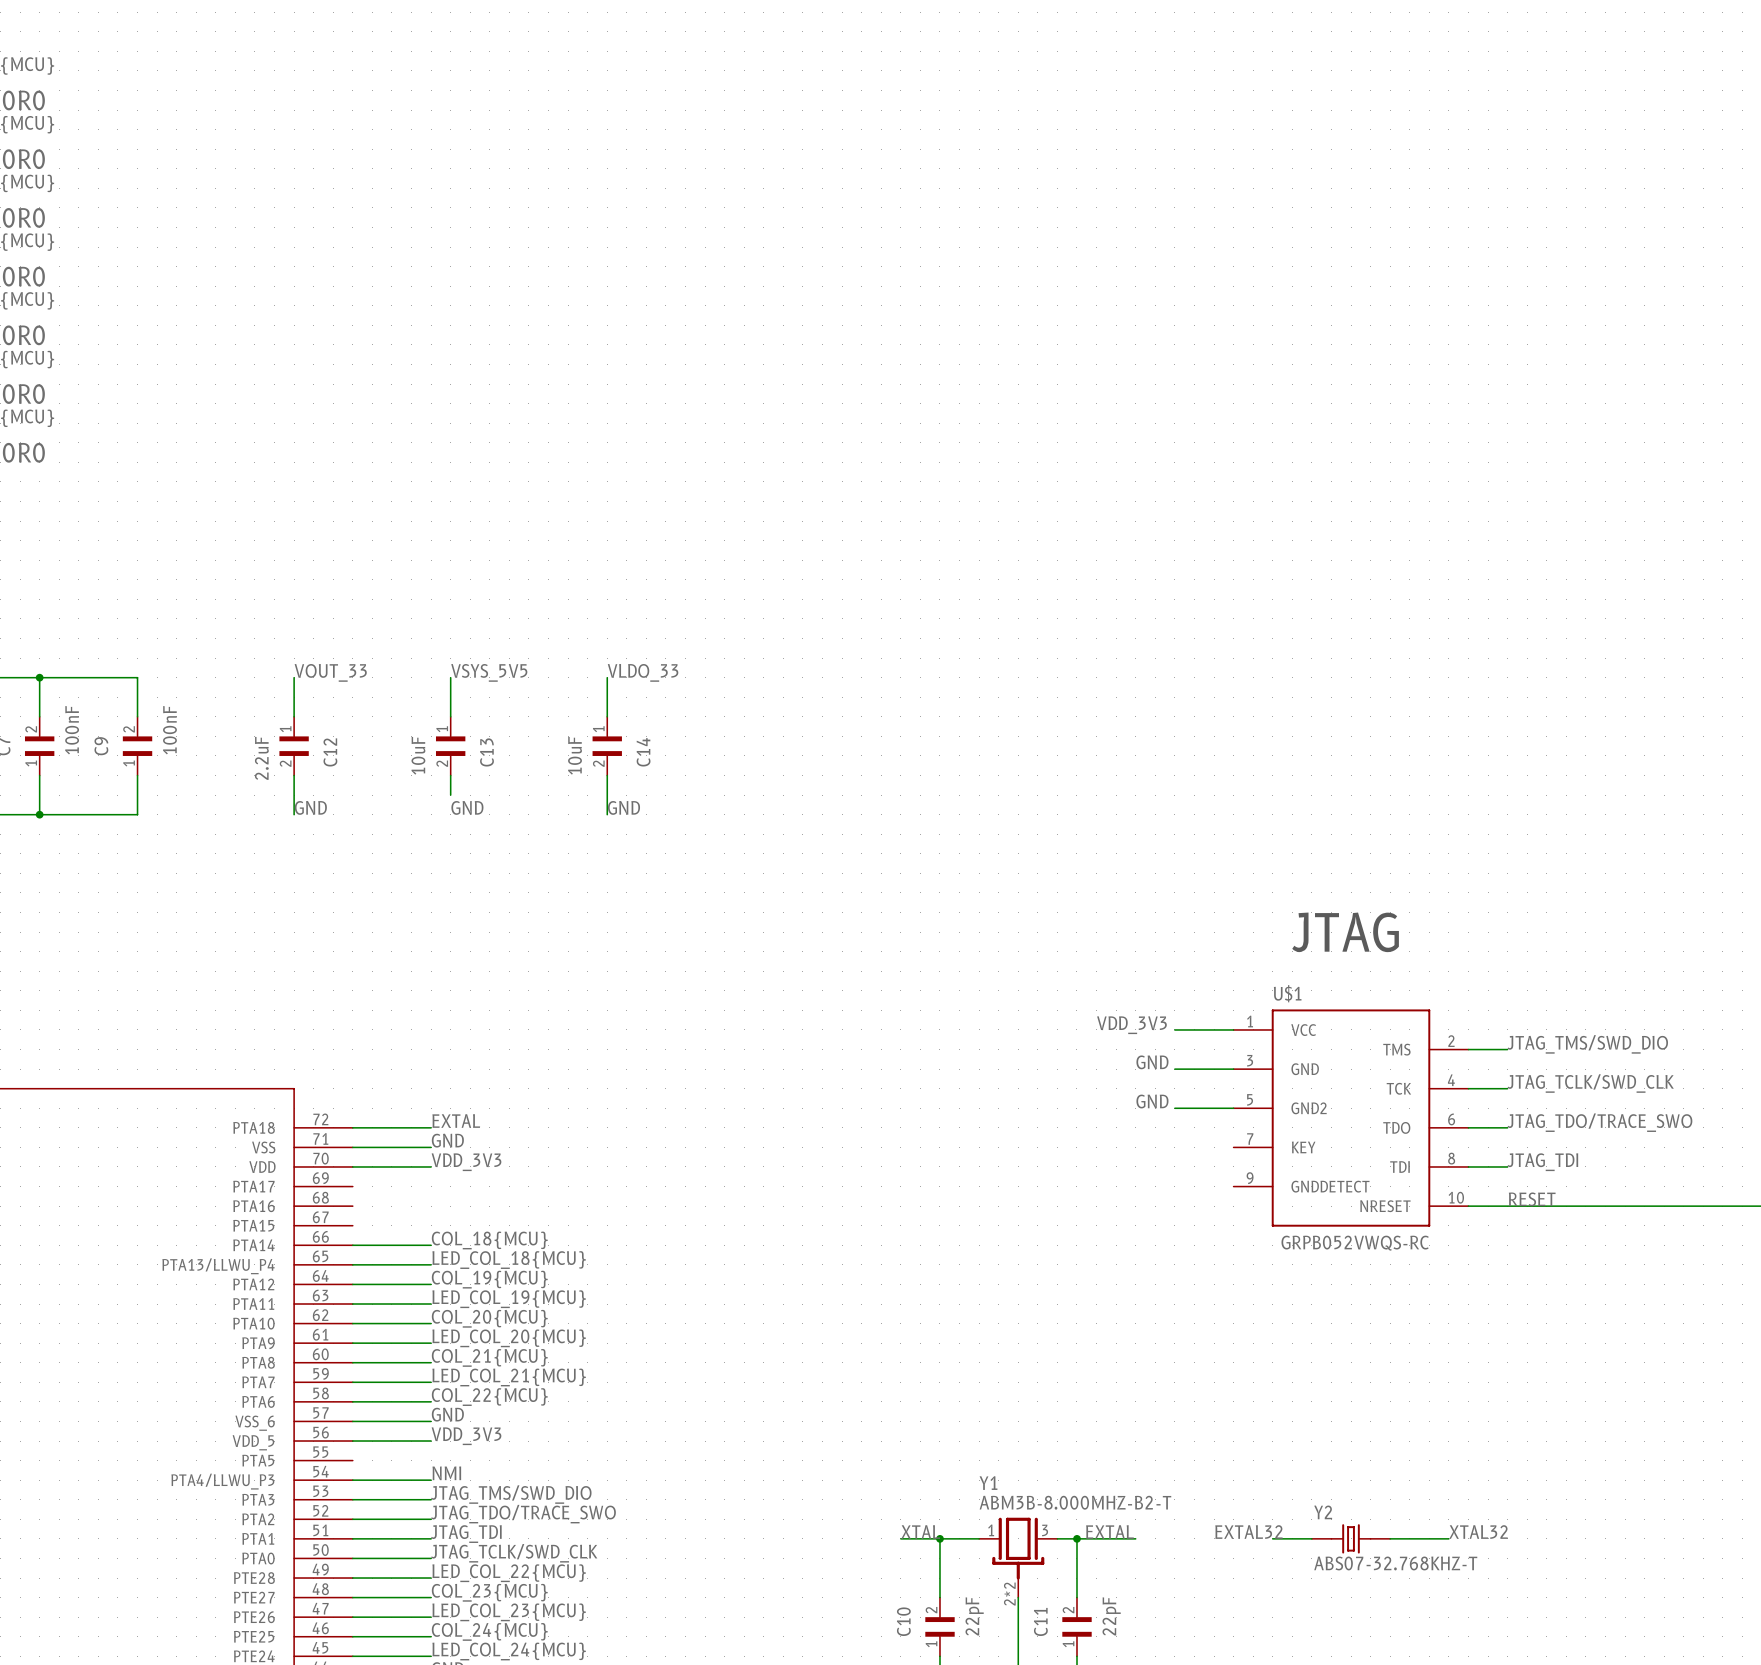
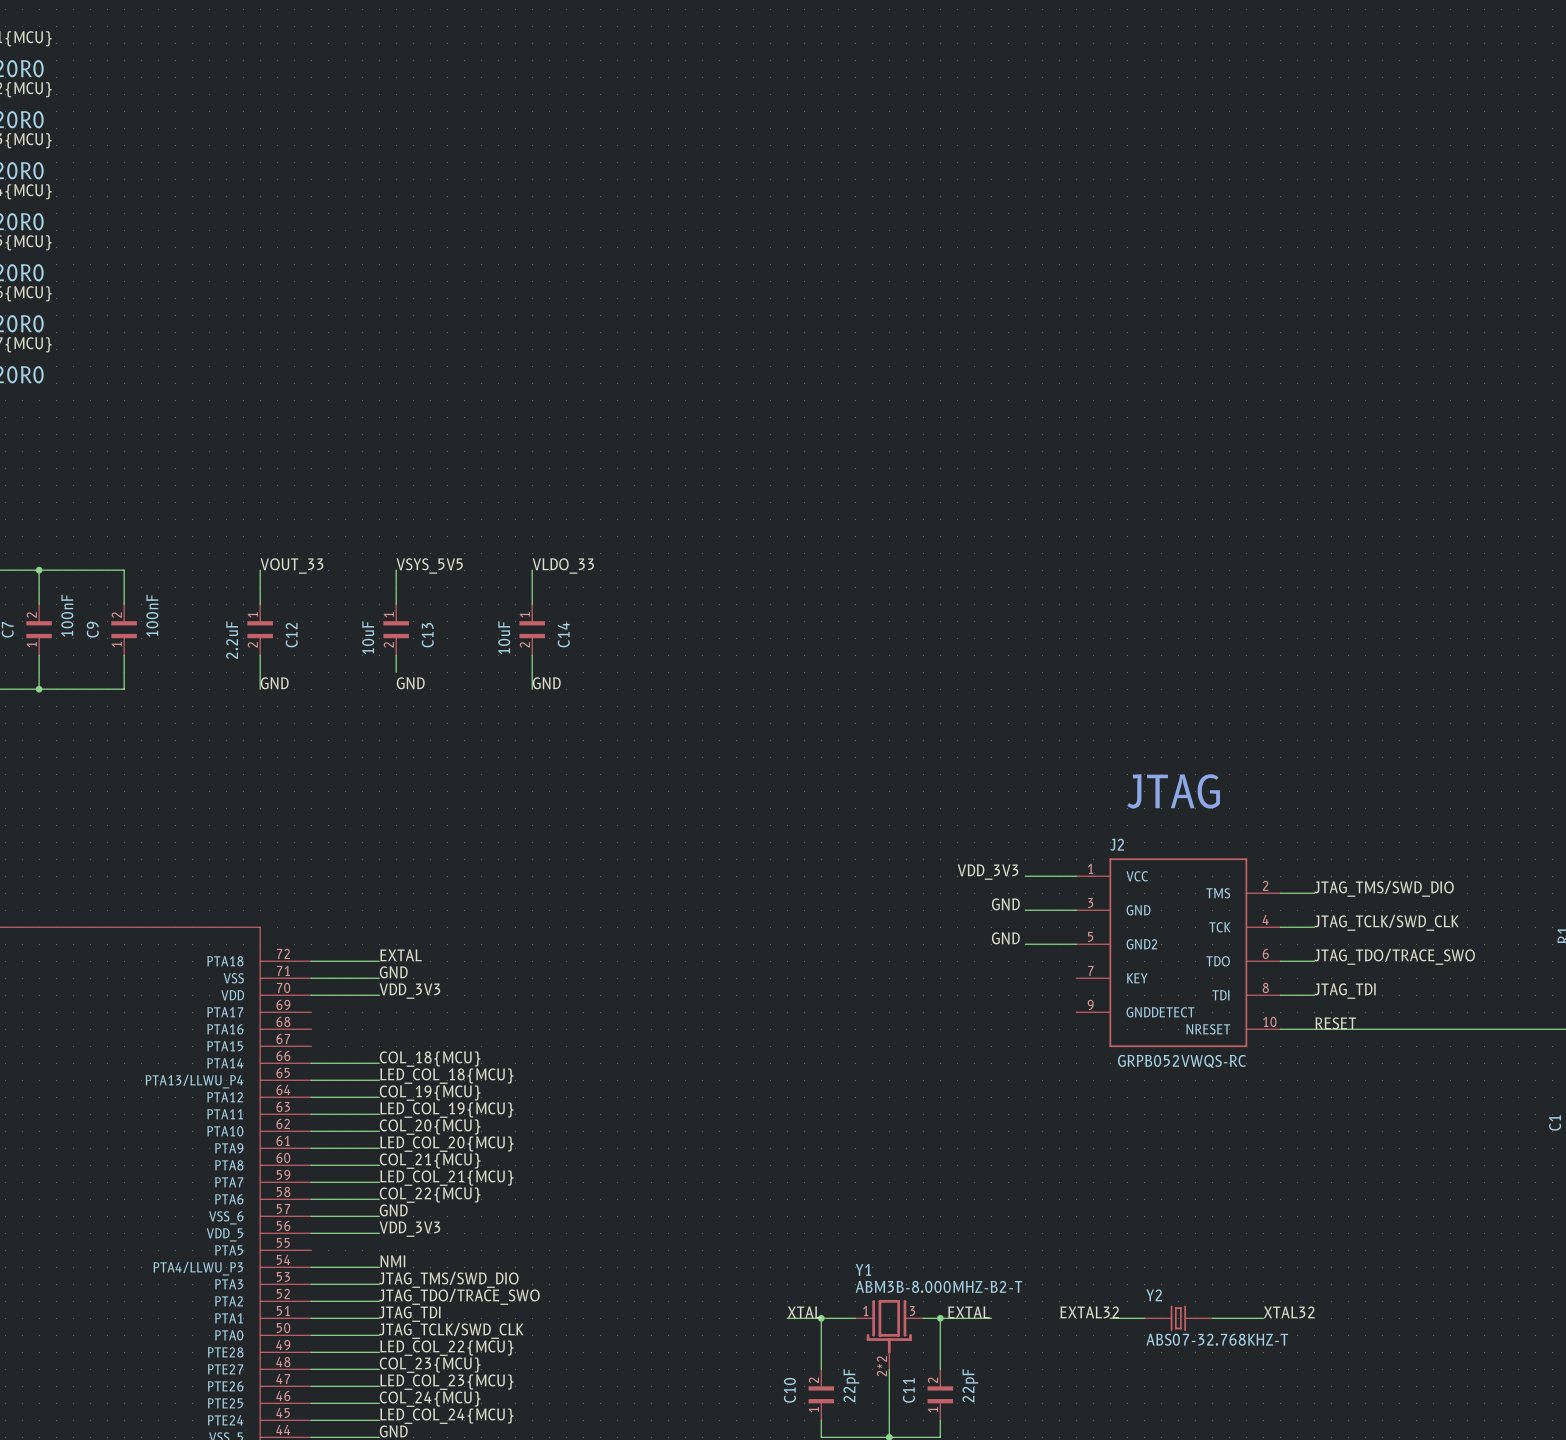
U$1 name: U$1 (1287, 993) -> J2 (1117, 844)

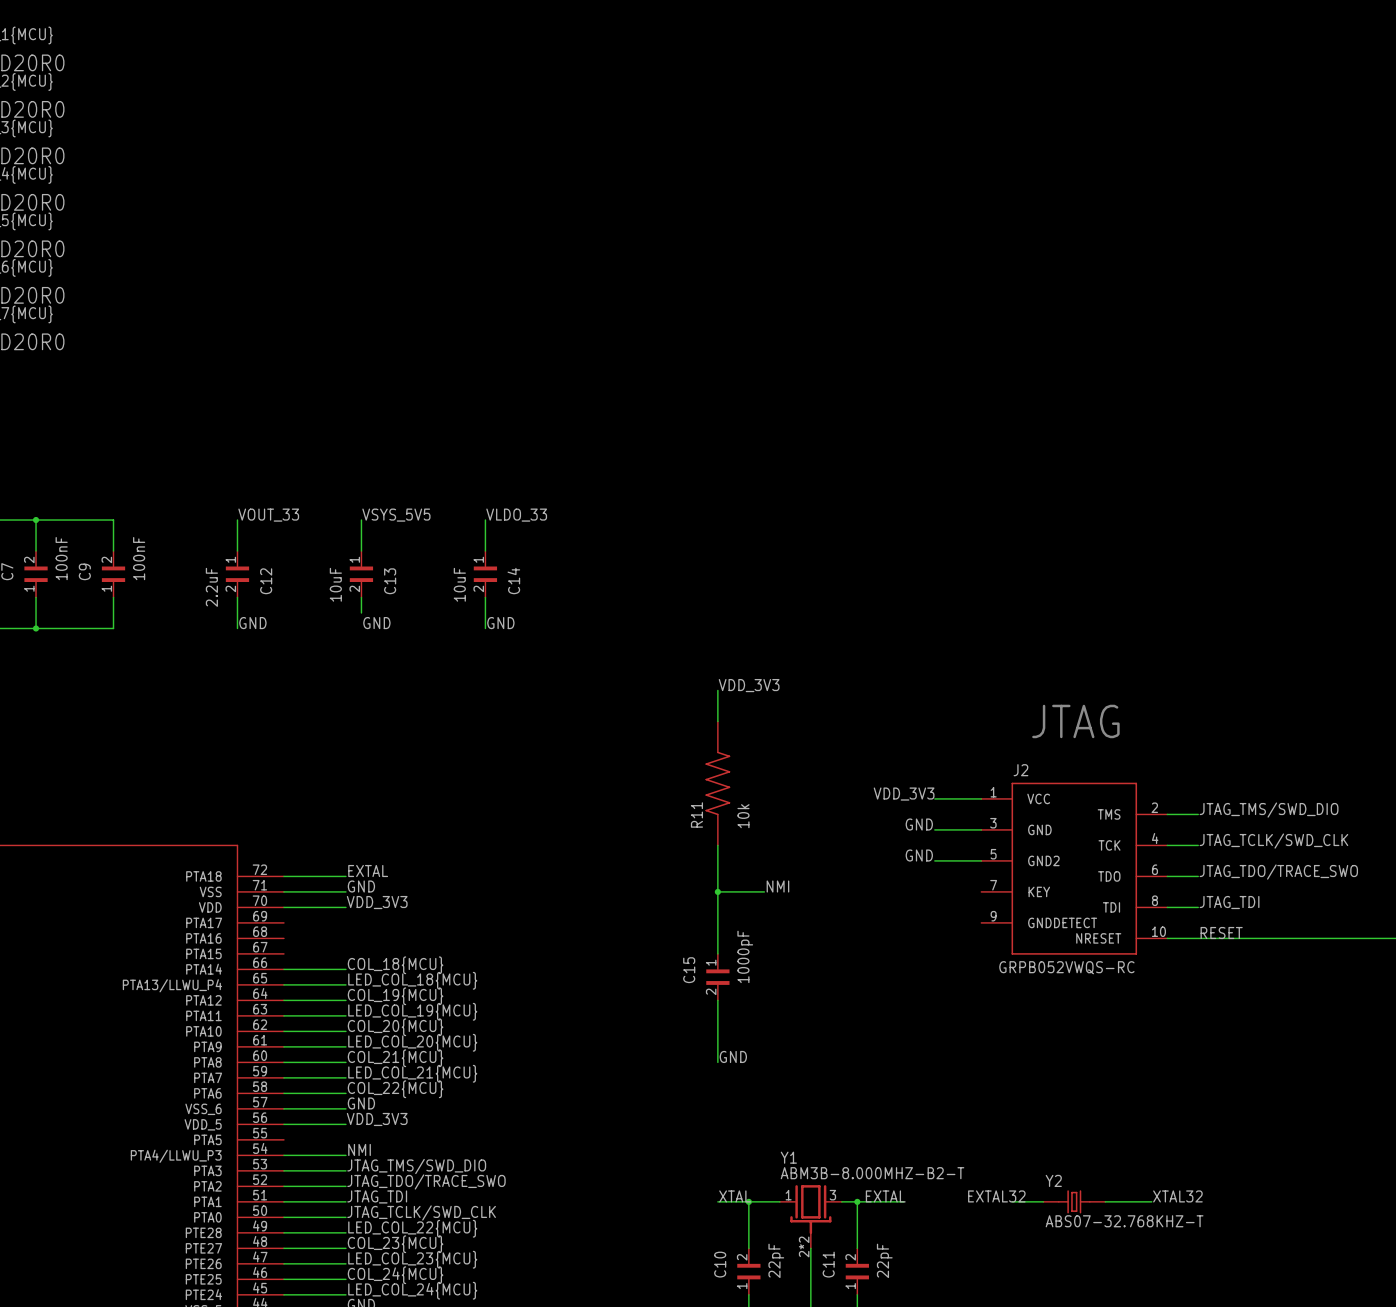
label: none -> VDD_3V3 (749, 685)
wire: none -> (717, 690) (717, 721)
R11: none -> 10k (717, 783)
wire: none -> (717, 845) (717, 953)
label: none -> NMI (777, 886)
wire: none -> (717, 891) (764, 891)
junction: none -> (717, 891)
C15: none -> 1000pF (717, 977)
wire: none -> (717, 1000) (717, 1062)
label: none -> GND (733, 1056)

